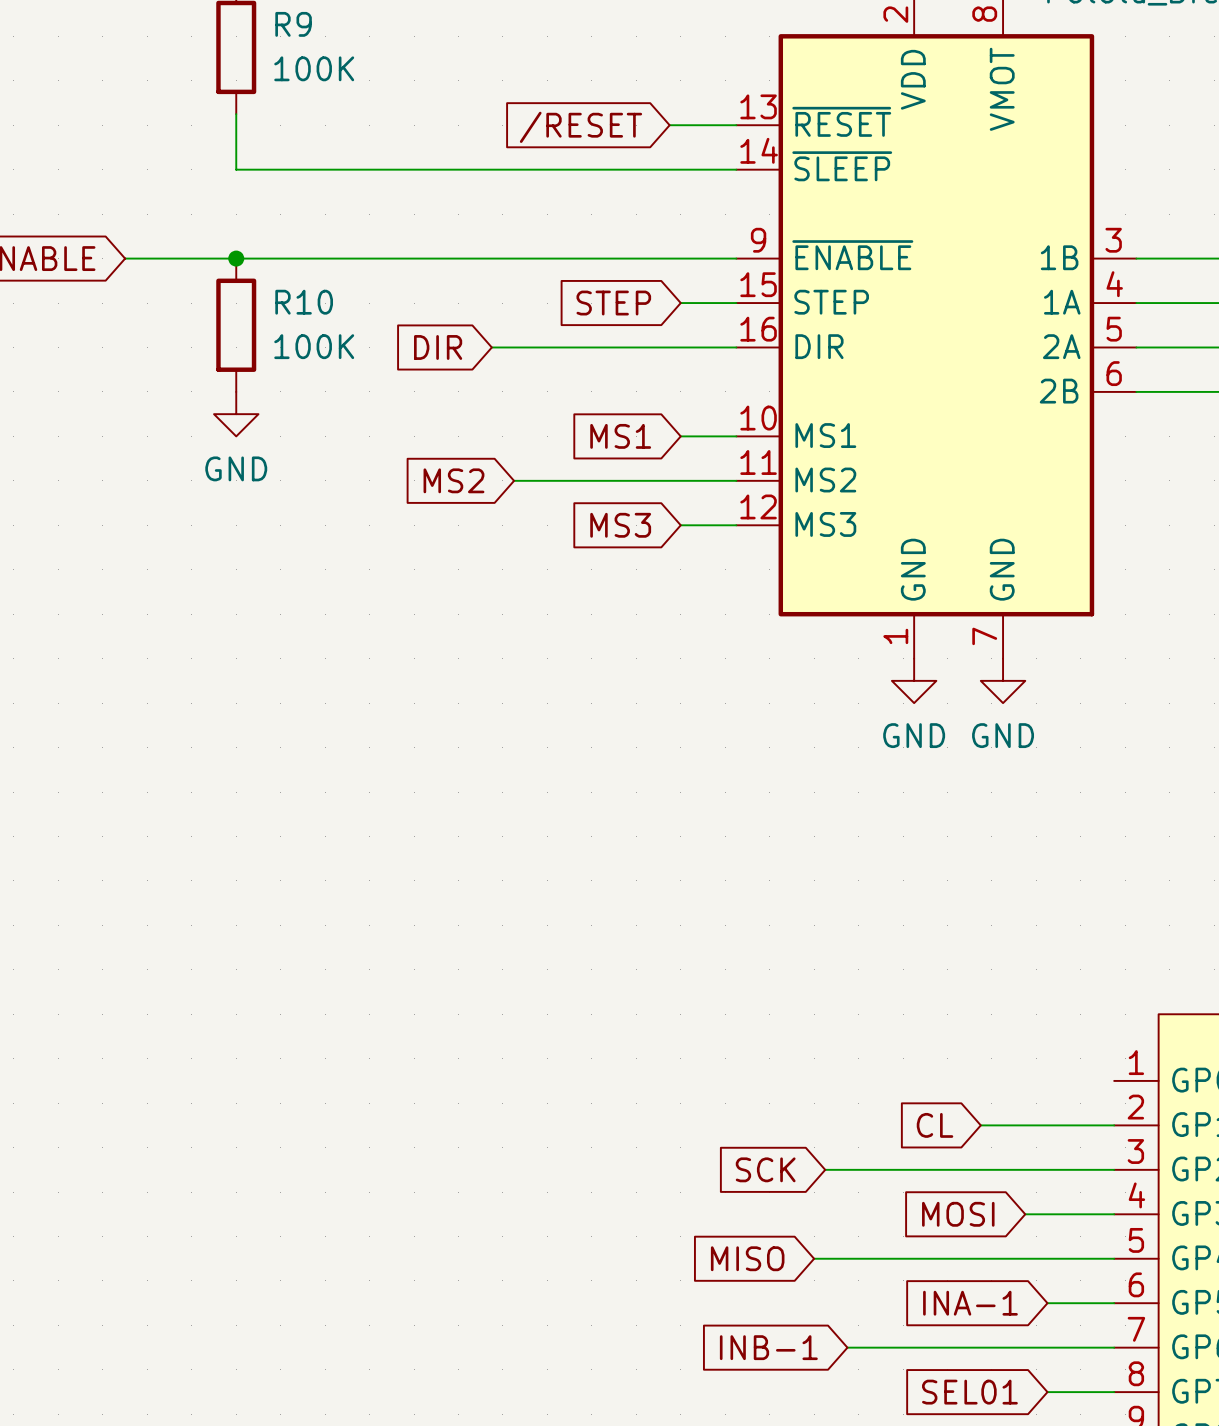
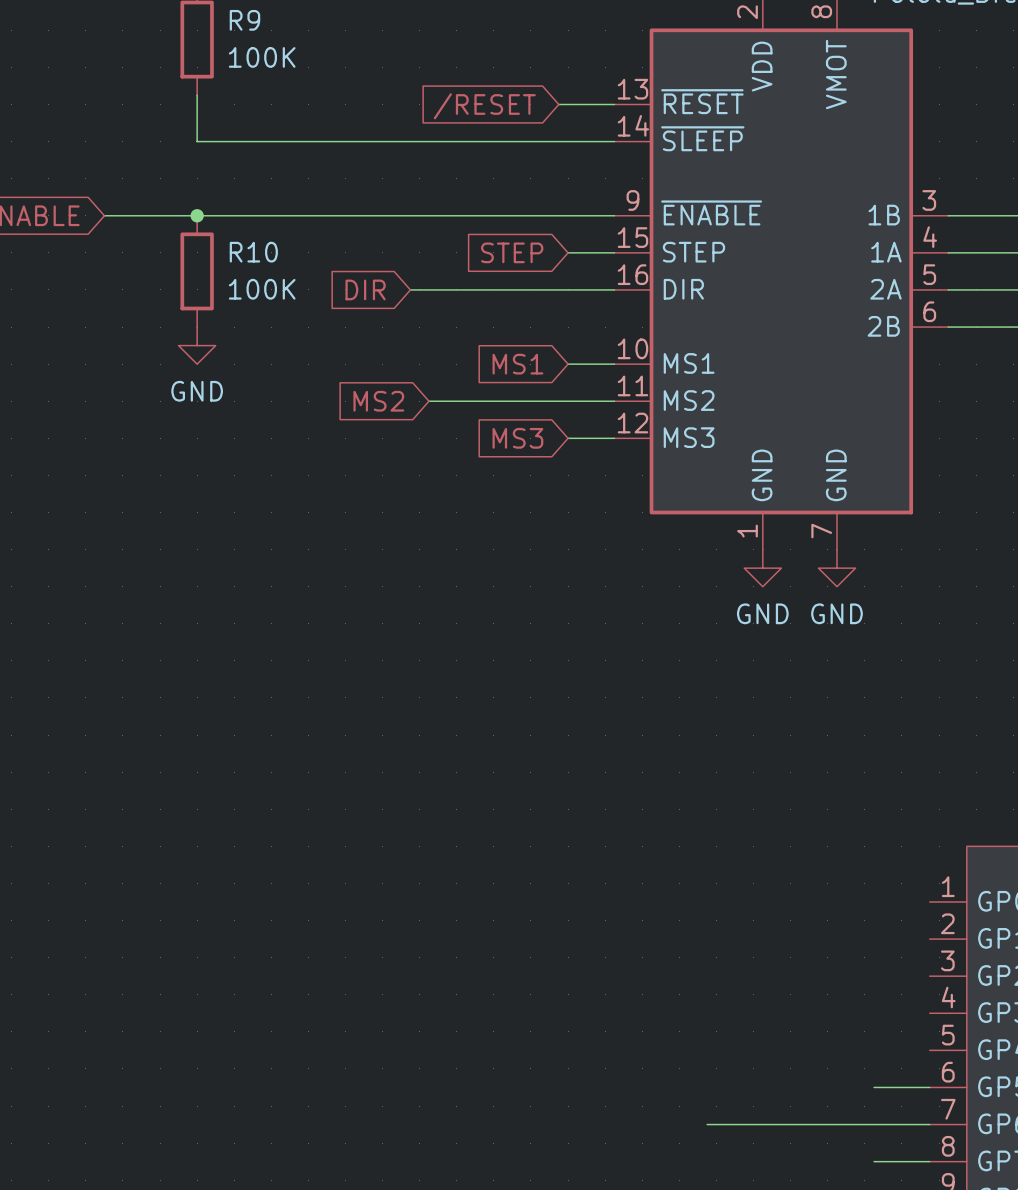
global label: CL (935, 1125) -> none
wire: (980, 1125) (1114, 1125) -> none
global label: SCK (765, 1169) -> none
wire: (825, 1169) (1114, 1169) -> none
global label: MOSI (958, 1214) -> none
wire: (1025, 1214) (1114, 1214) -> none
global label: MISO (747, 1258) -> none
wire: (814, 1258) (1114, 1258) -> none
global label: INA-1 (970, 1303) -> none
global label: INB-1 (768, 1347) -> none
global label: SEL01 (969, 1392) -> none

